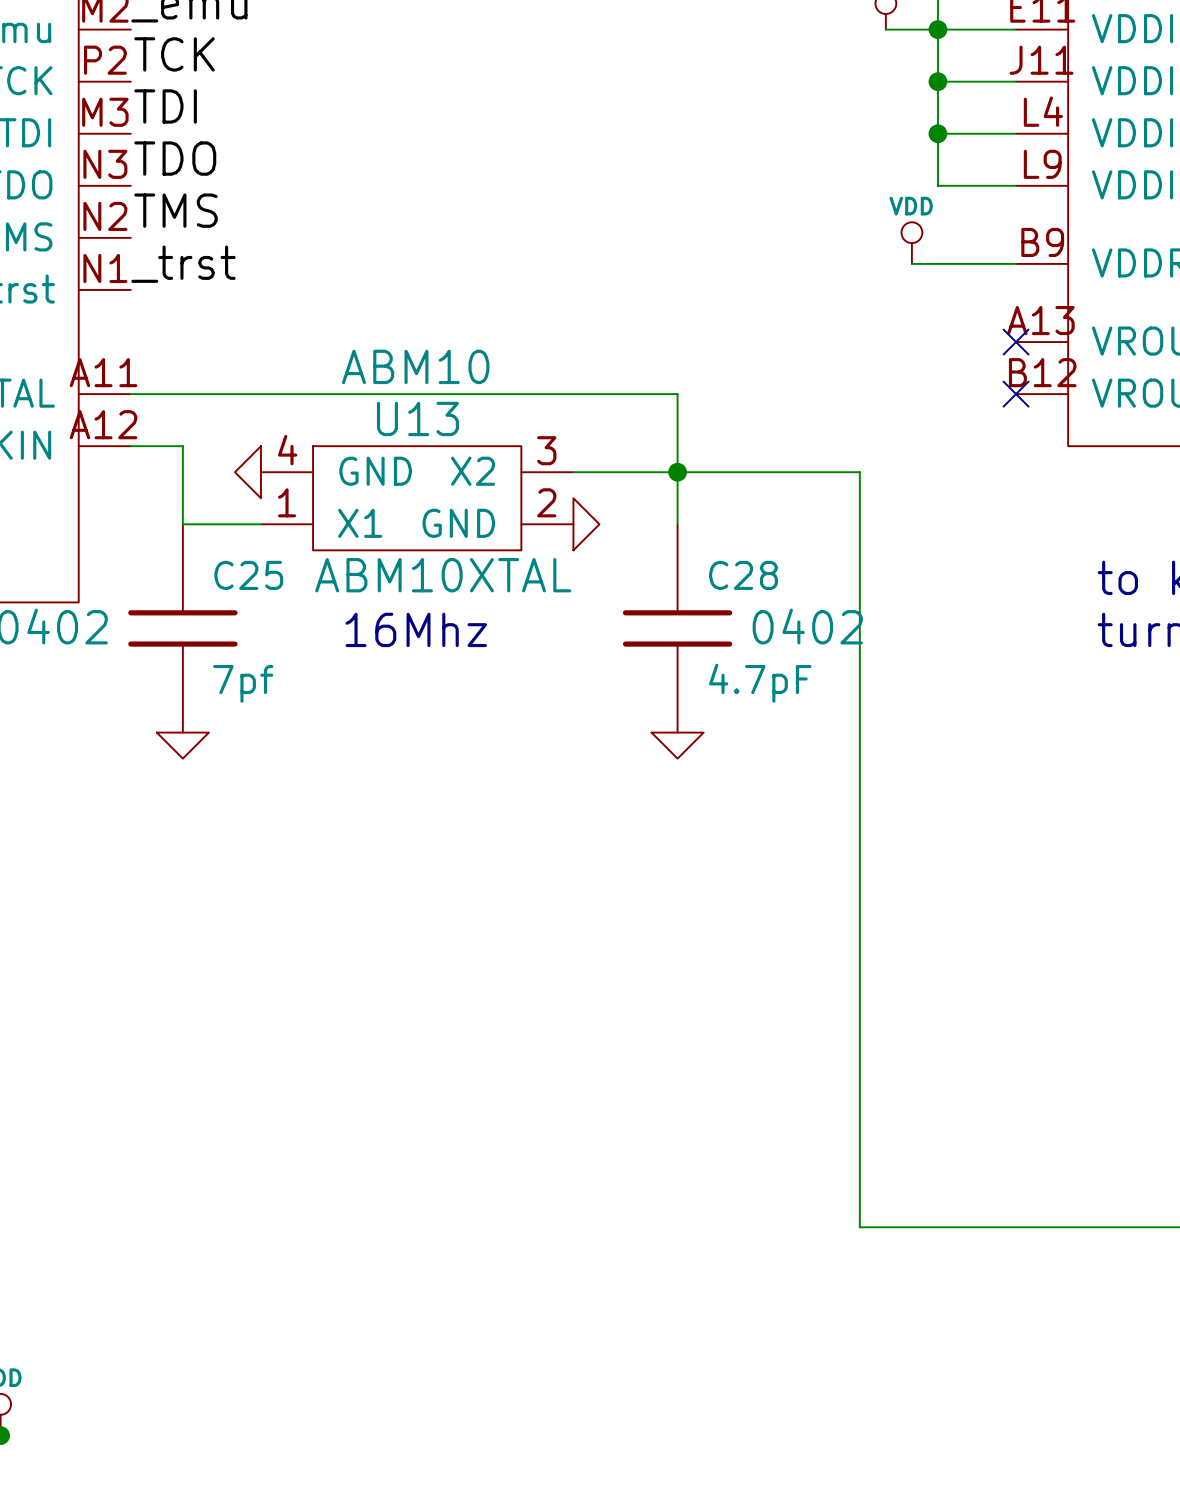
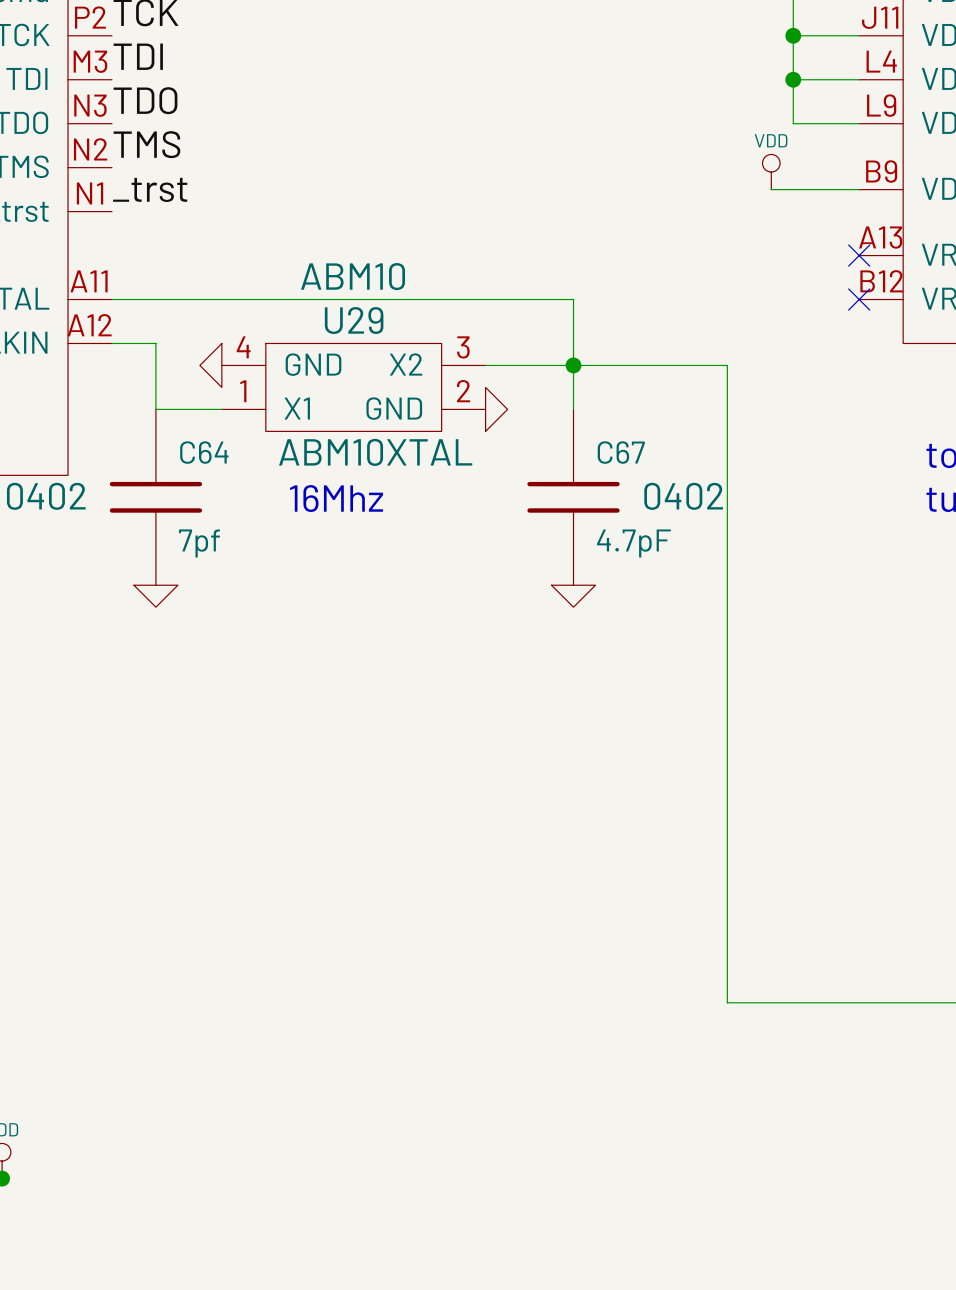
U13 name: U13 (417, 418) -> U29 (354, 320)
C25 name: C25 (248, 575) -> C64 (204, 452)
C28 name: C28 (743, 575) -> C67 (621, 452)

